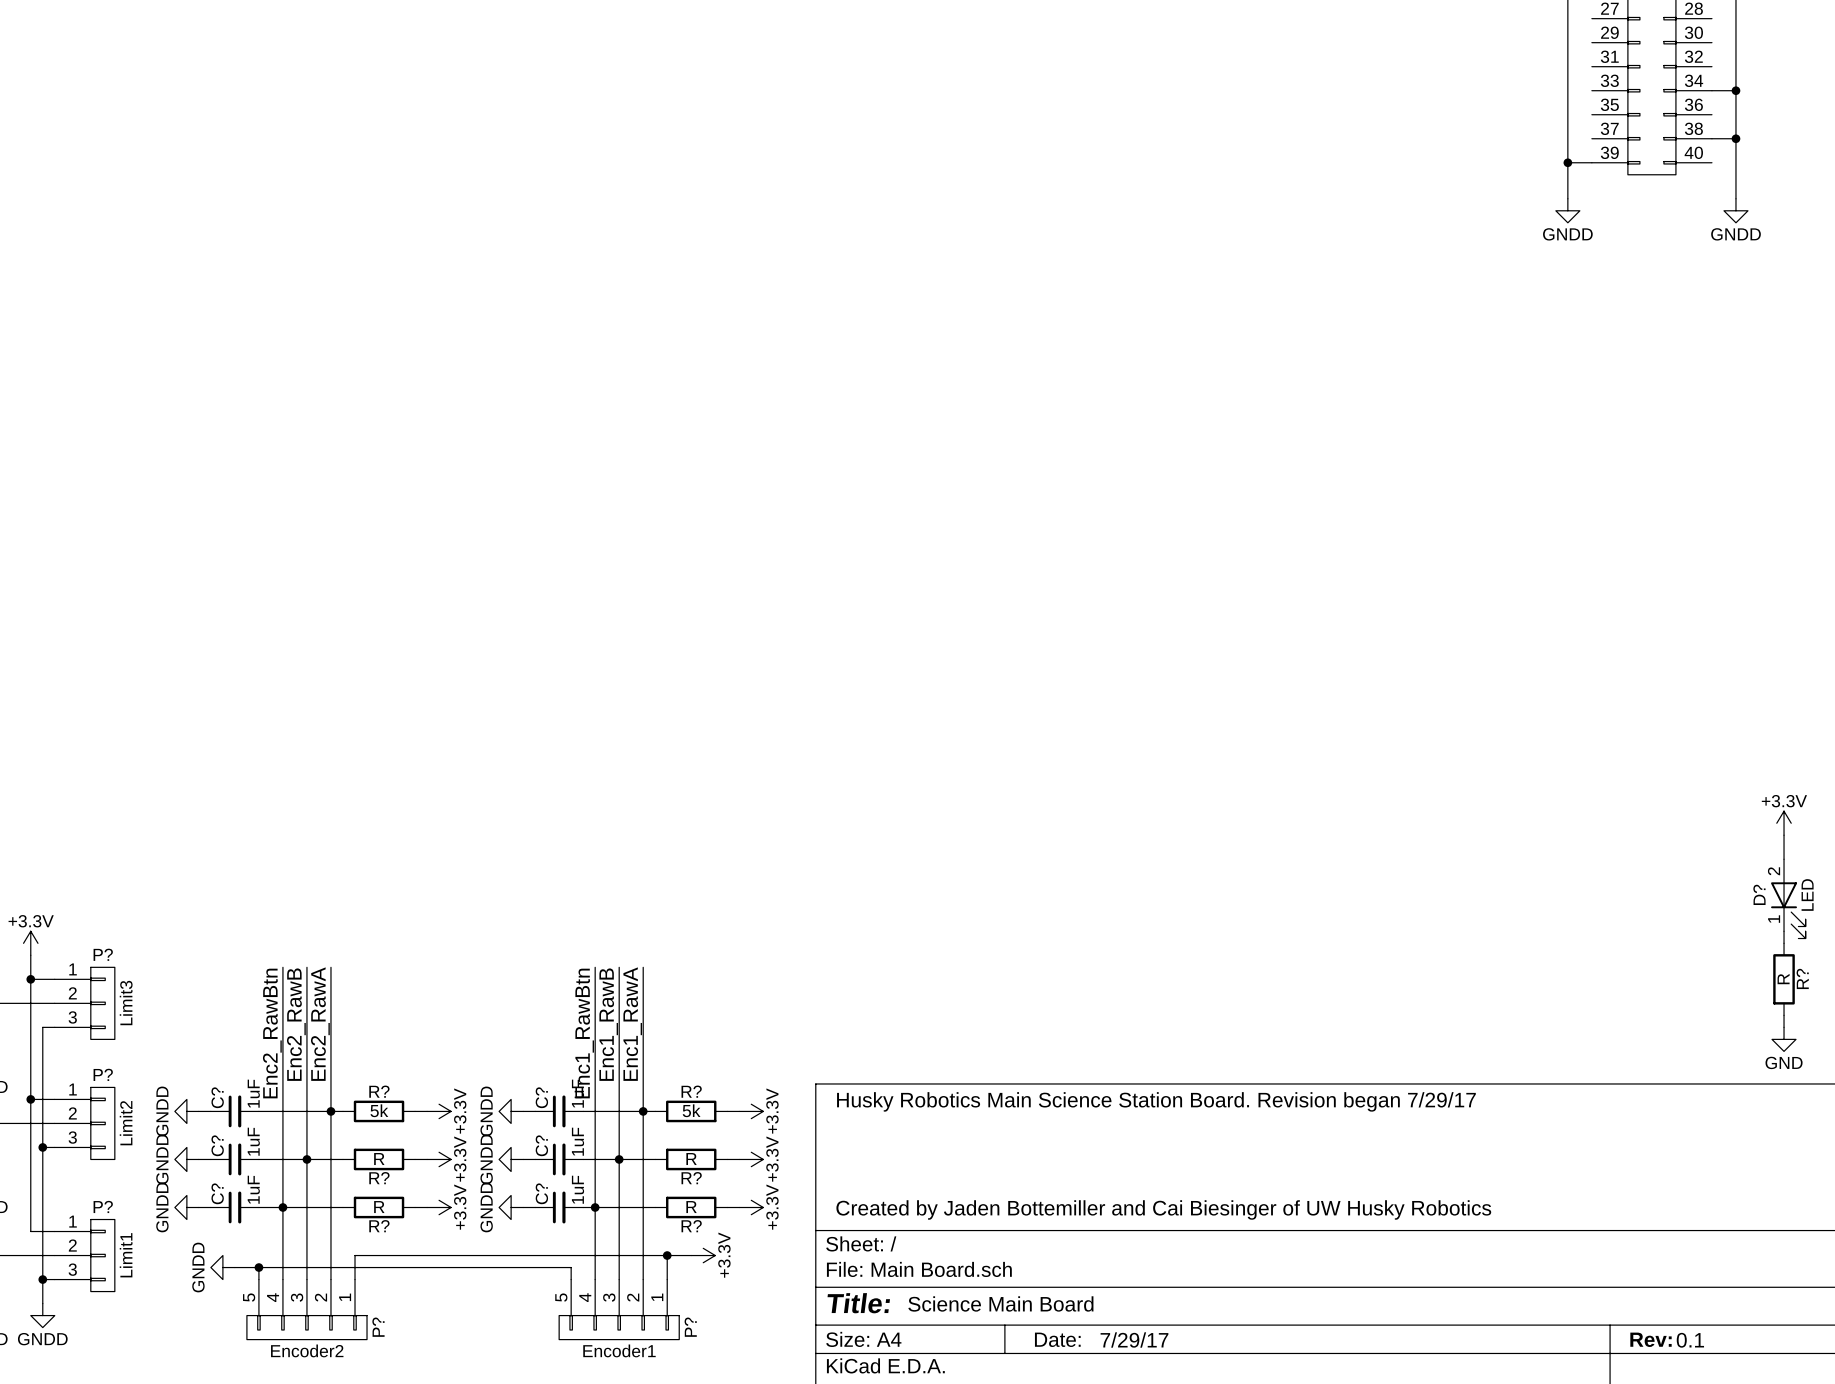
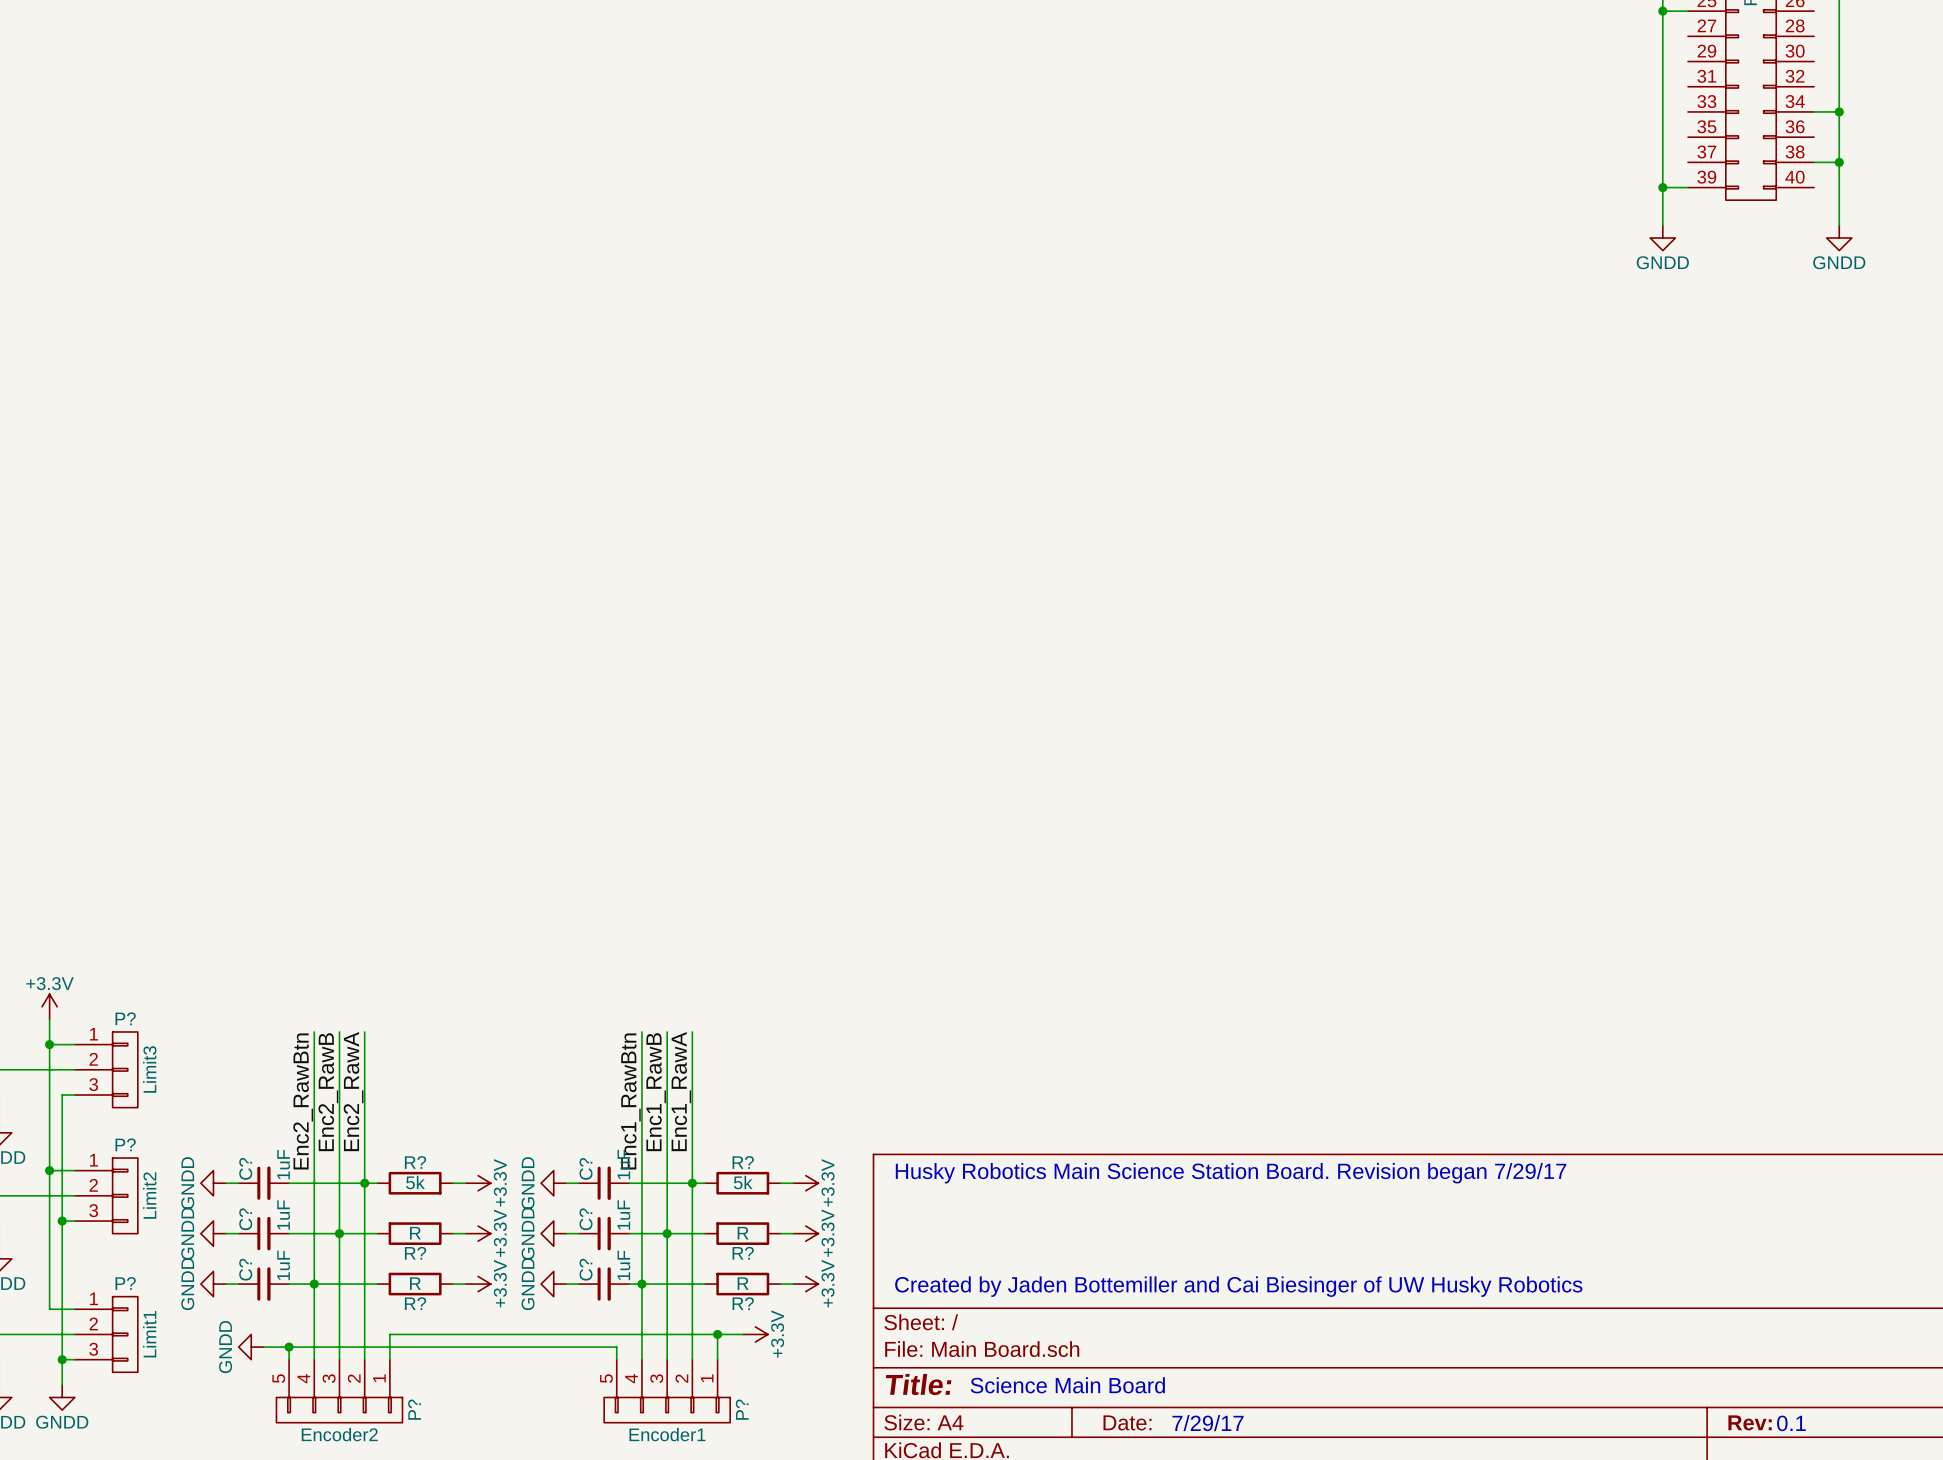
power symbol: +3.3V (1784, 823) -> none
wire: (1784, 835) (1784, 859) -> none
D?: LED (1788, 898) -> none
wire: (1784, 931) (1784, 943) -> none
R?: R (1784, 979) -> none
wire: (1784, 1015) (1784, 1027) -> none
power symbol: GND (1784, 1039) -> none

